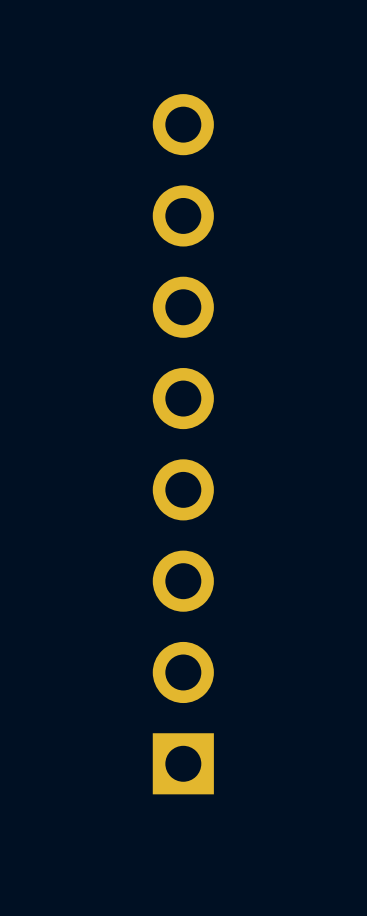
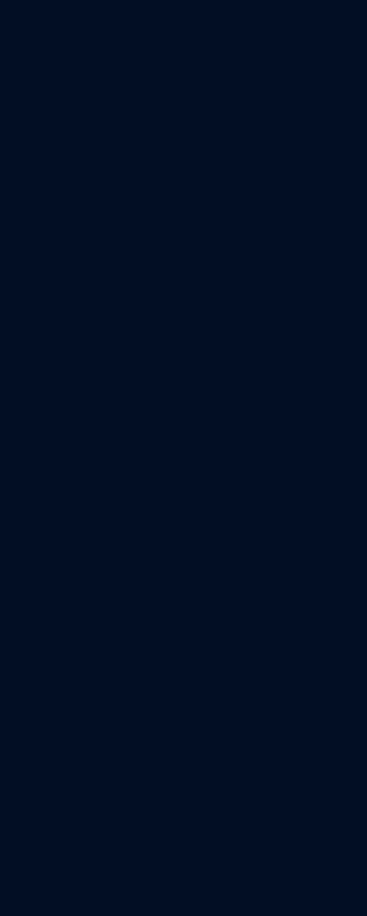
part: (183, 444) -> none

